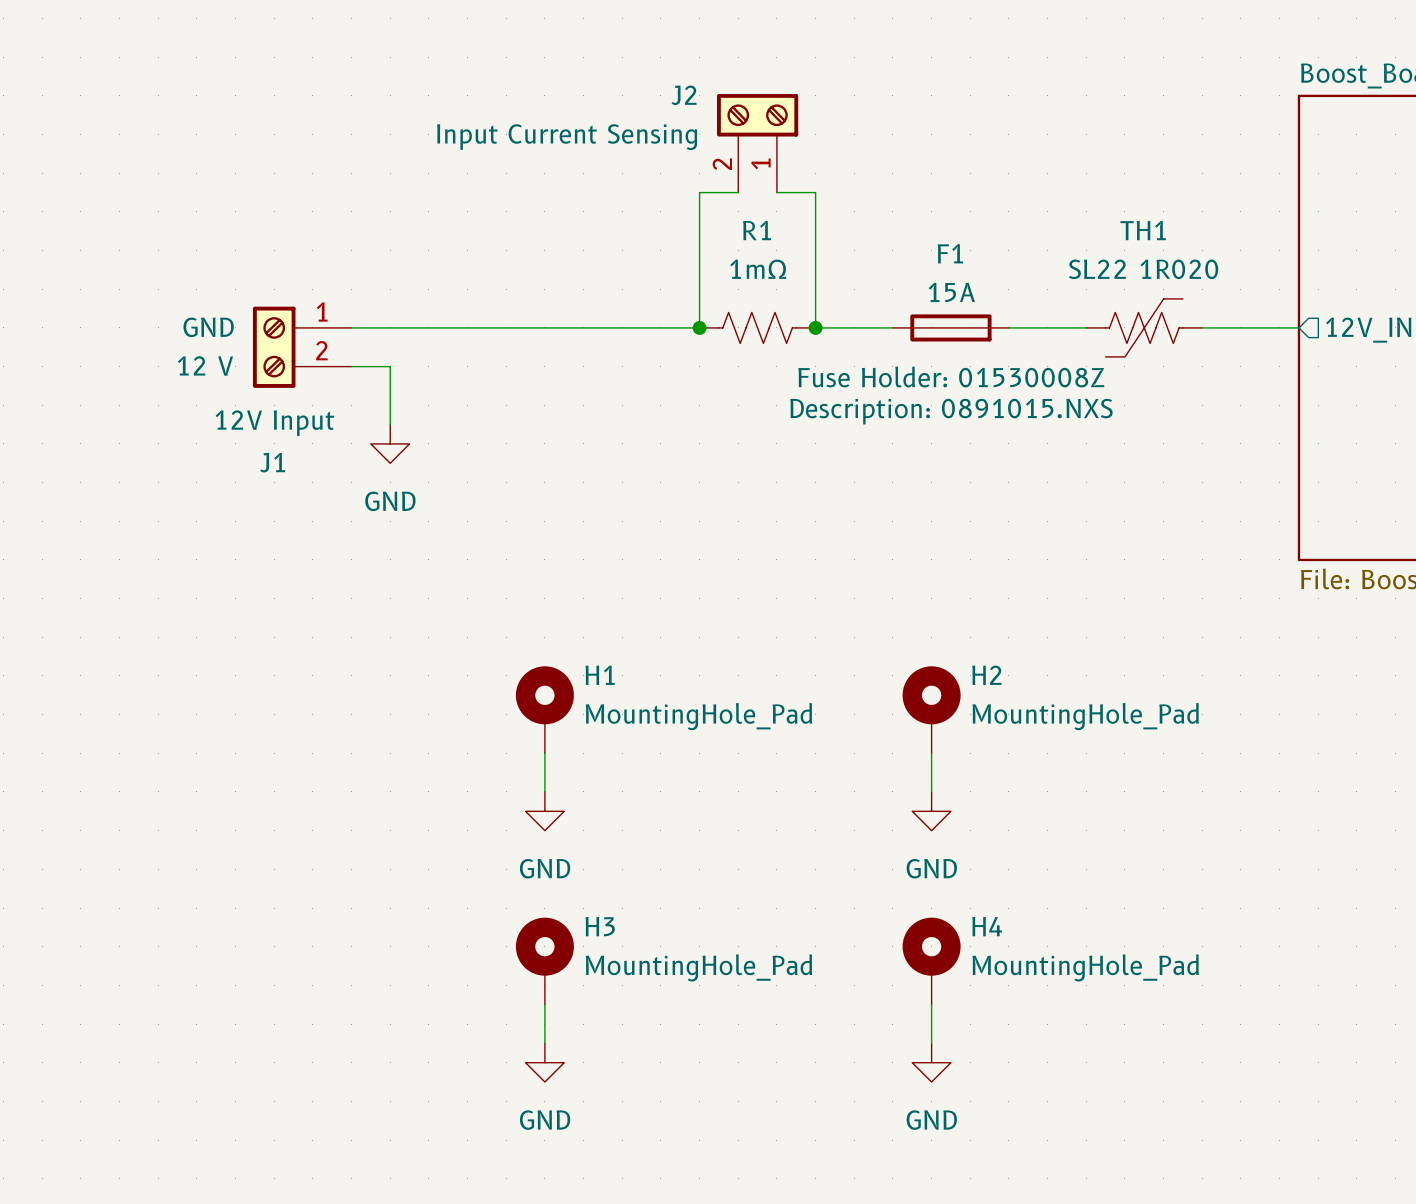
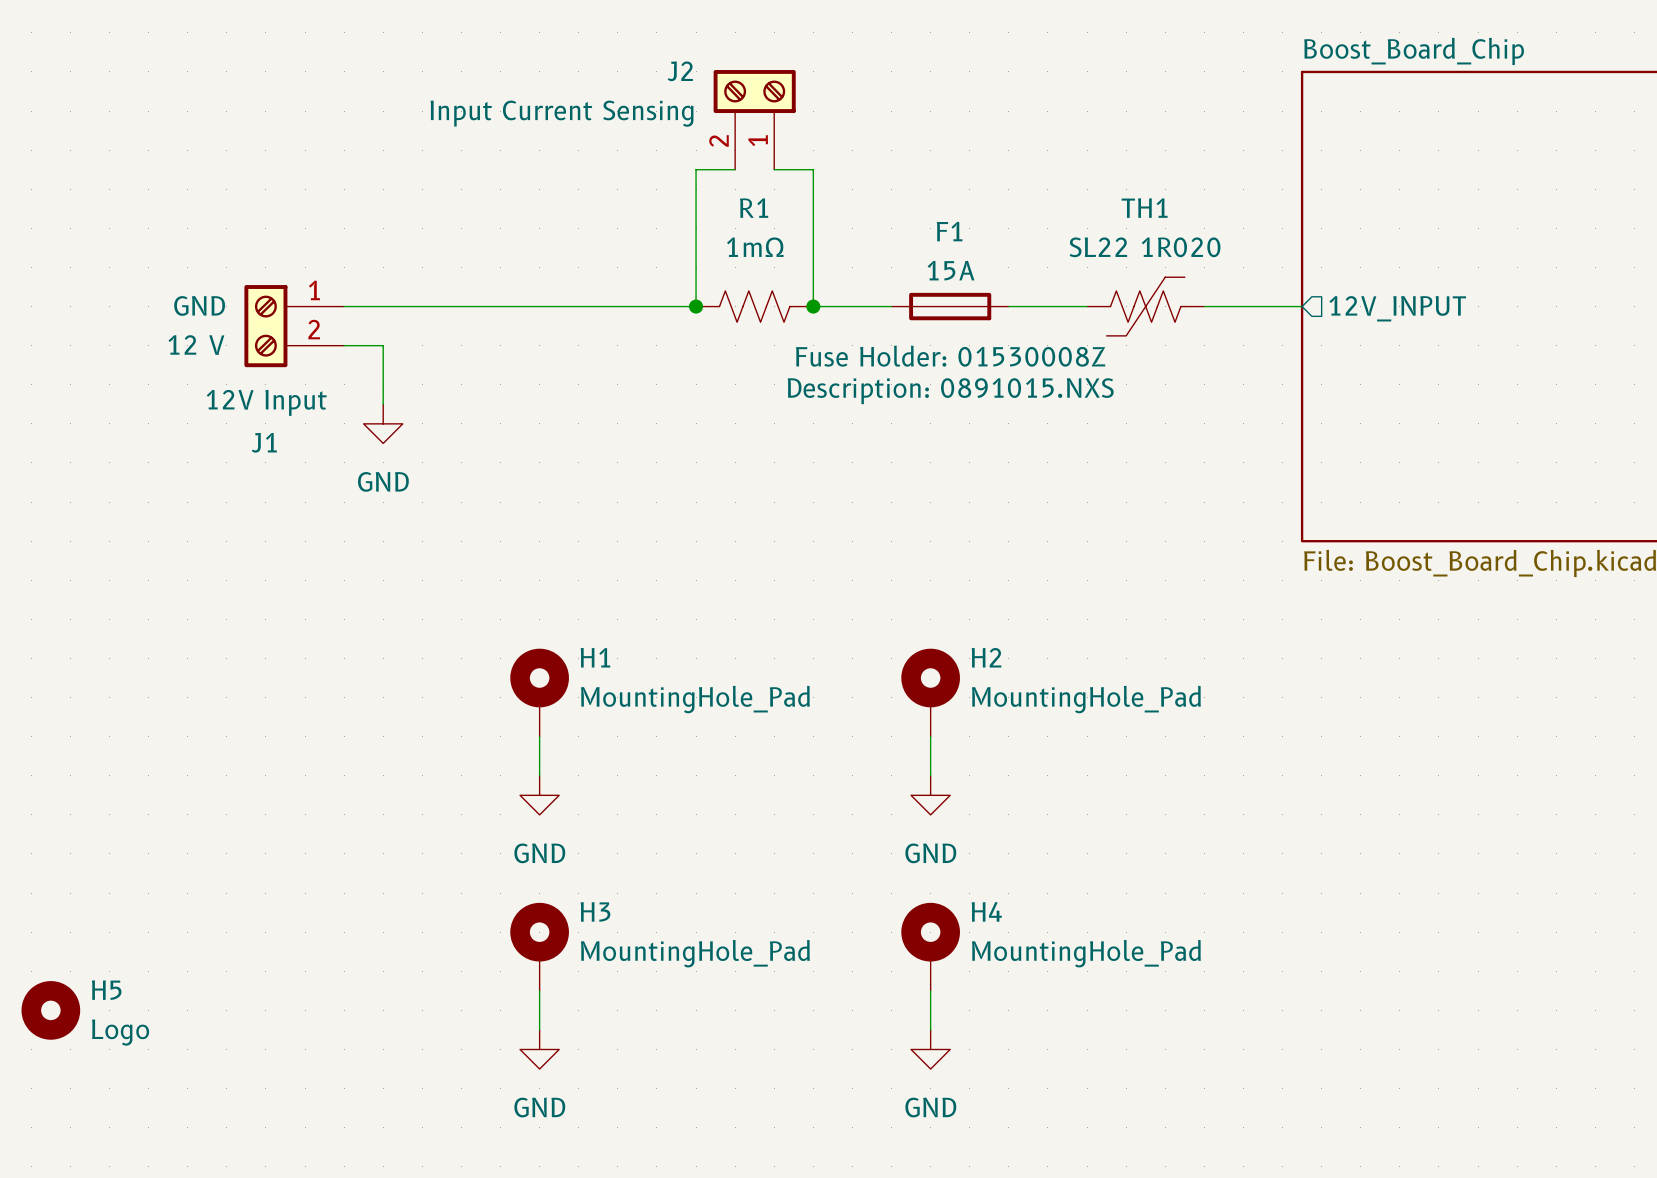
H5: none -> Logo (50, 1010)

